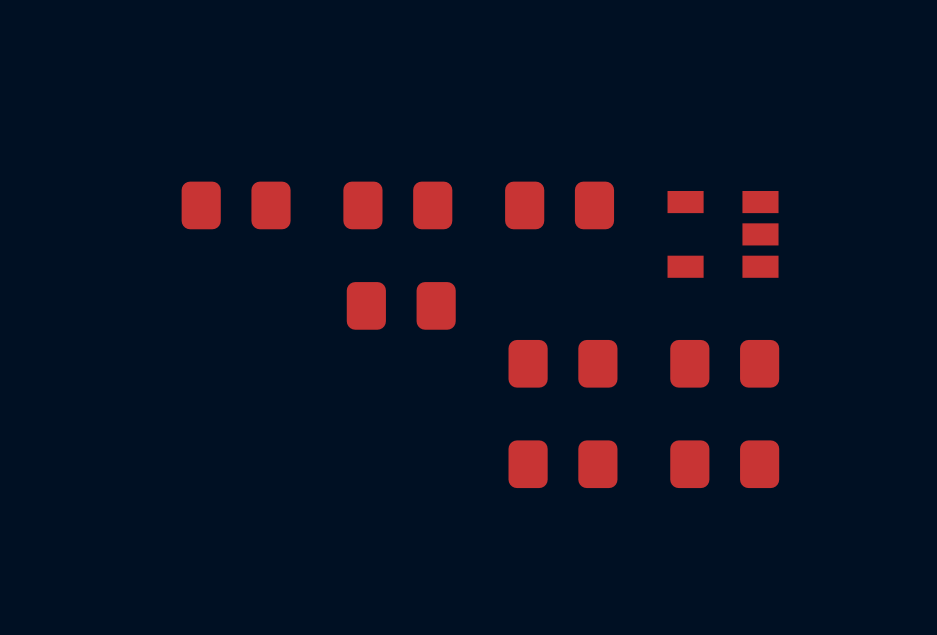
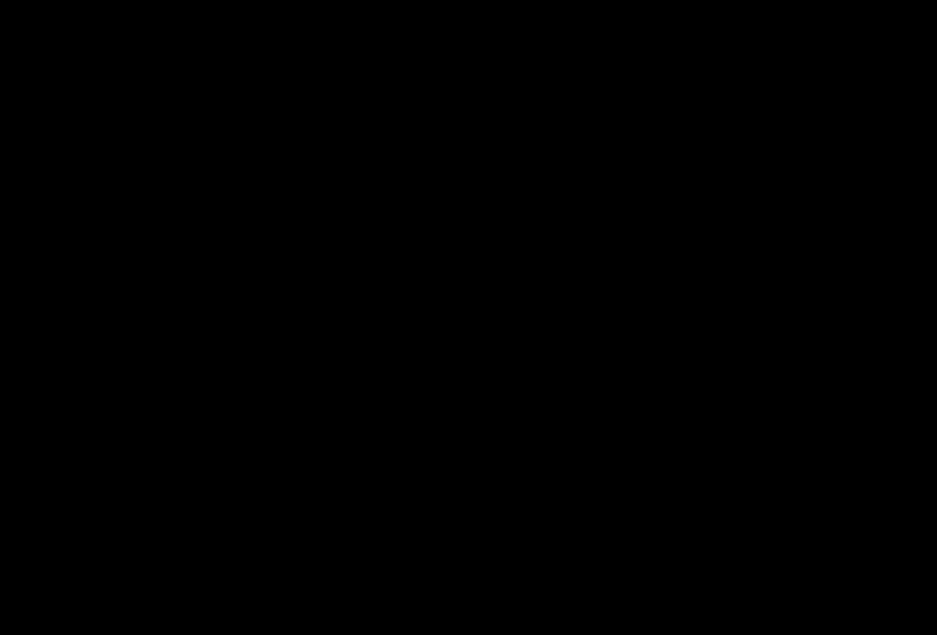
part: (236, 205) -> none
part: (397, 205) -> none
part: (559, 205) -> none
part: (723, 234) -> none
part: (401, 305) -> none
part: (562, 363) -> none
part: (724, 363) -> none
part: (562, 464) -> none
part: (724, 464) -> none

